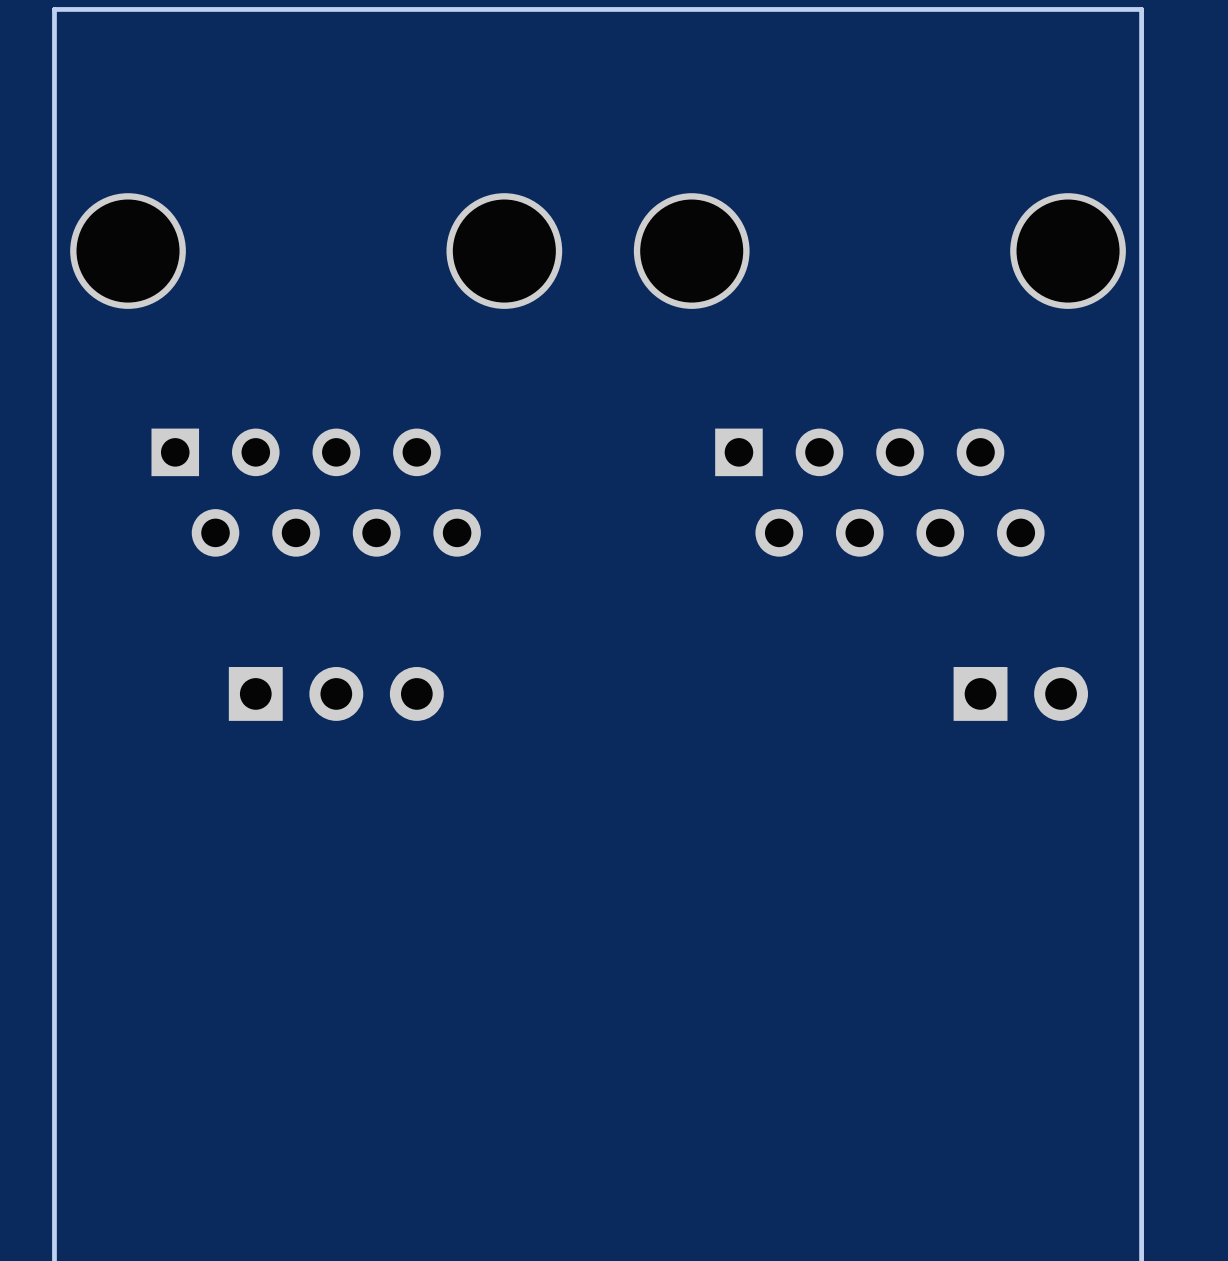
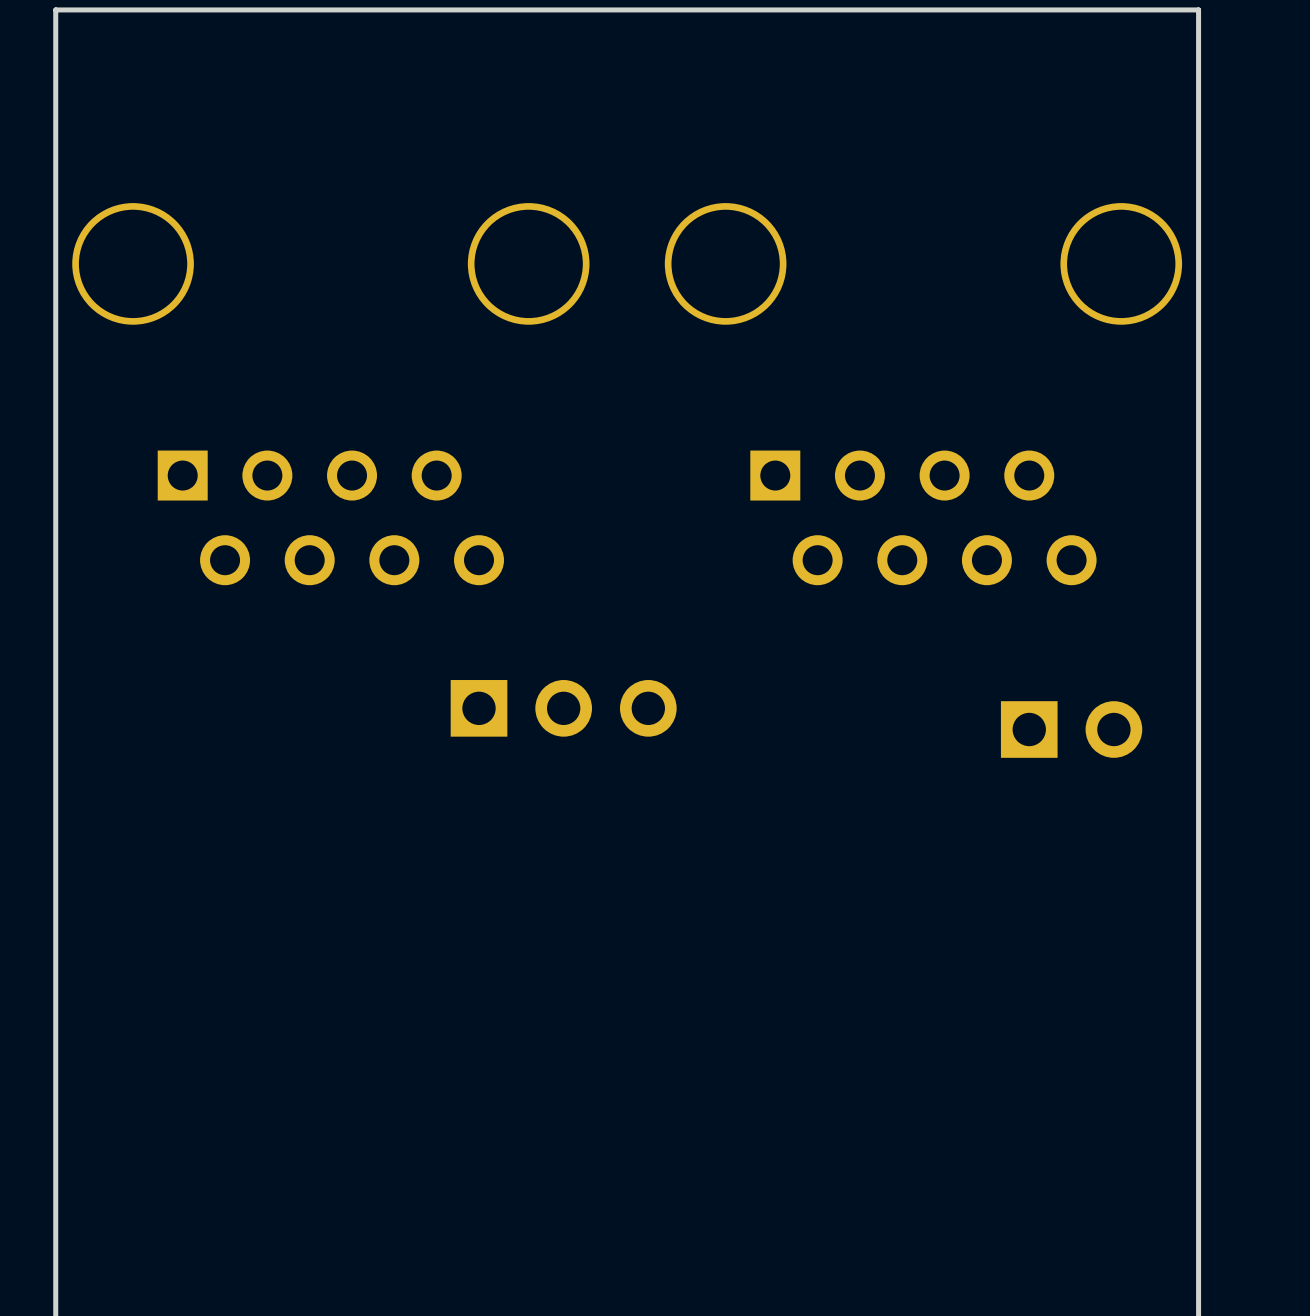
part position: (336, 693) -> (563, 708)

